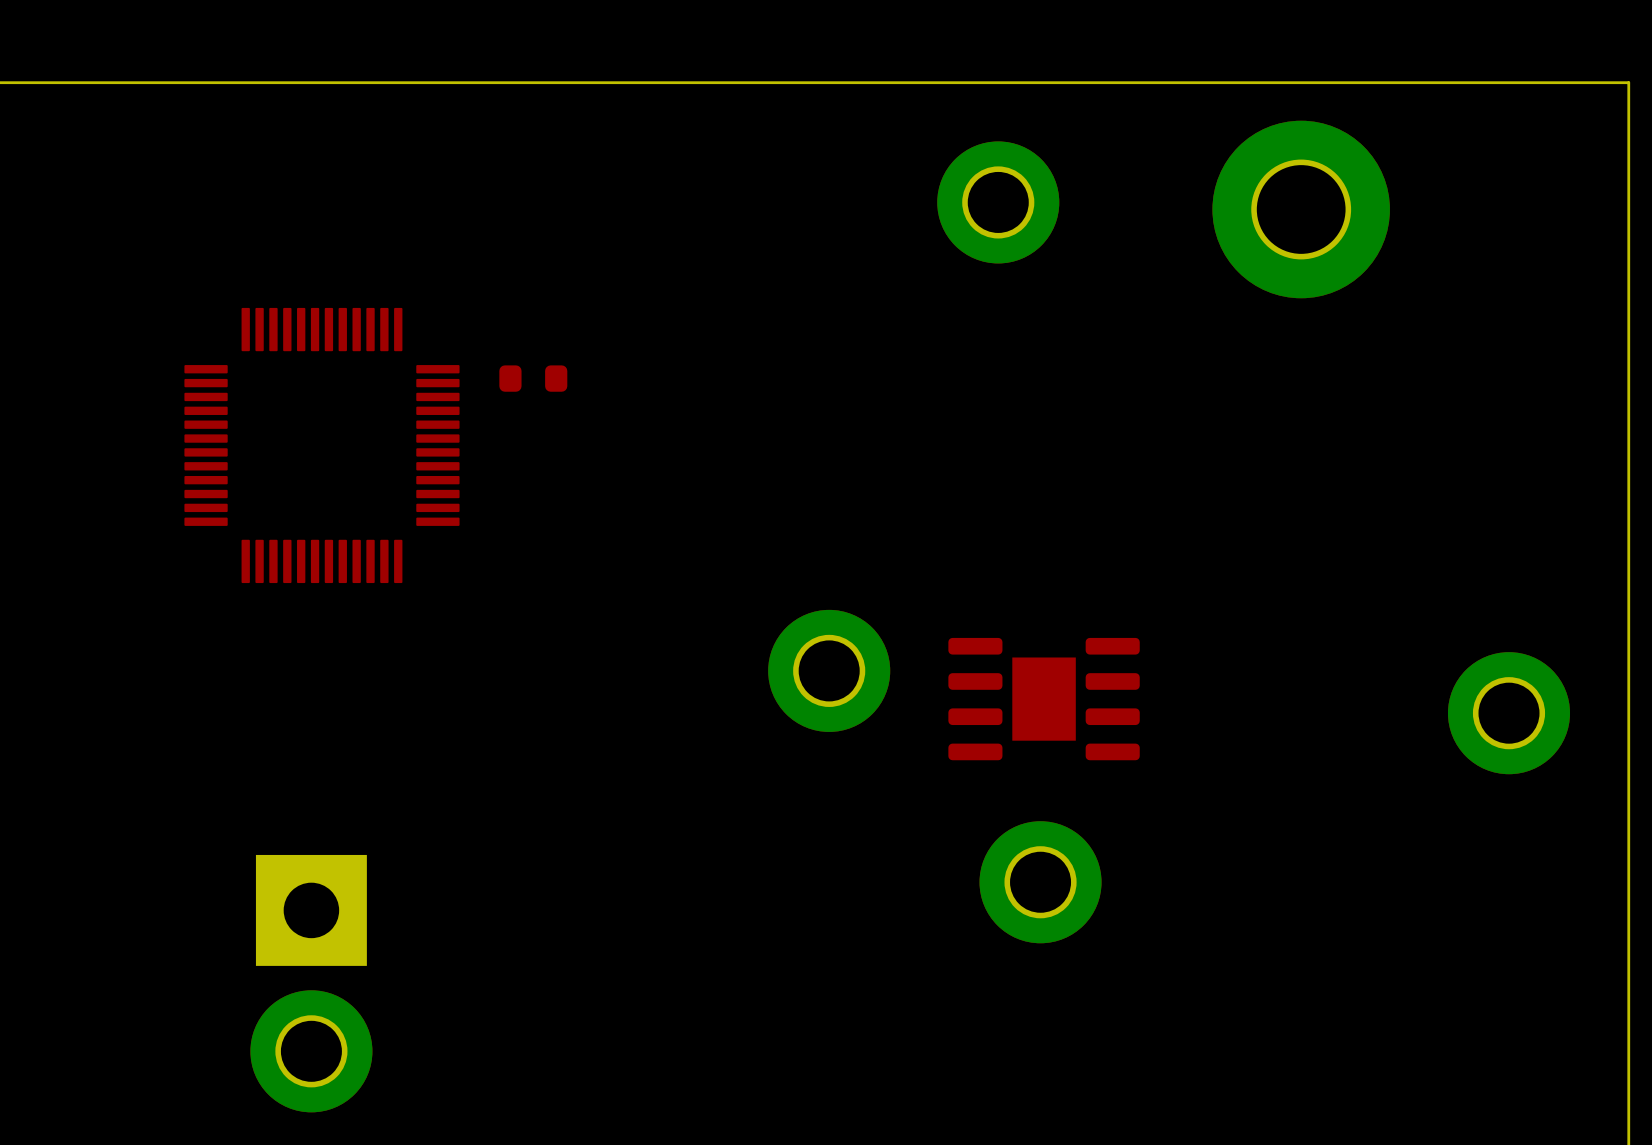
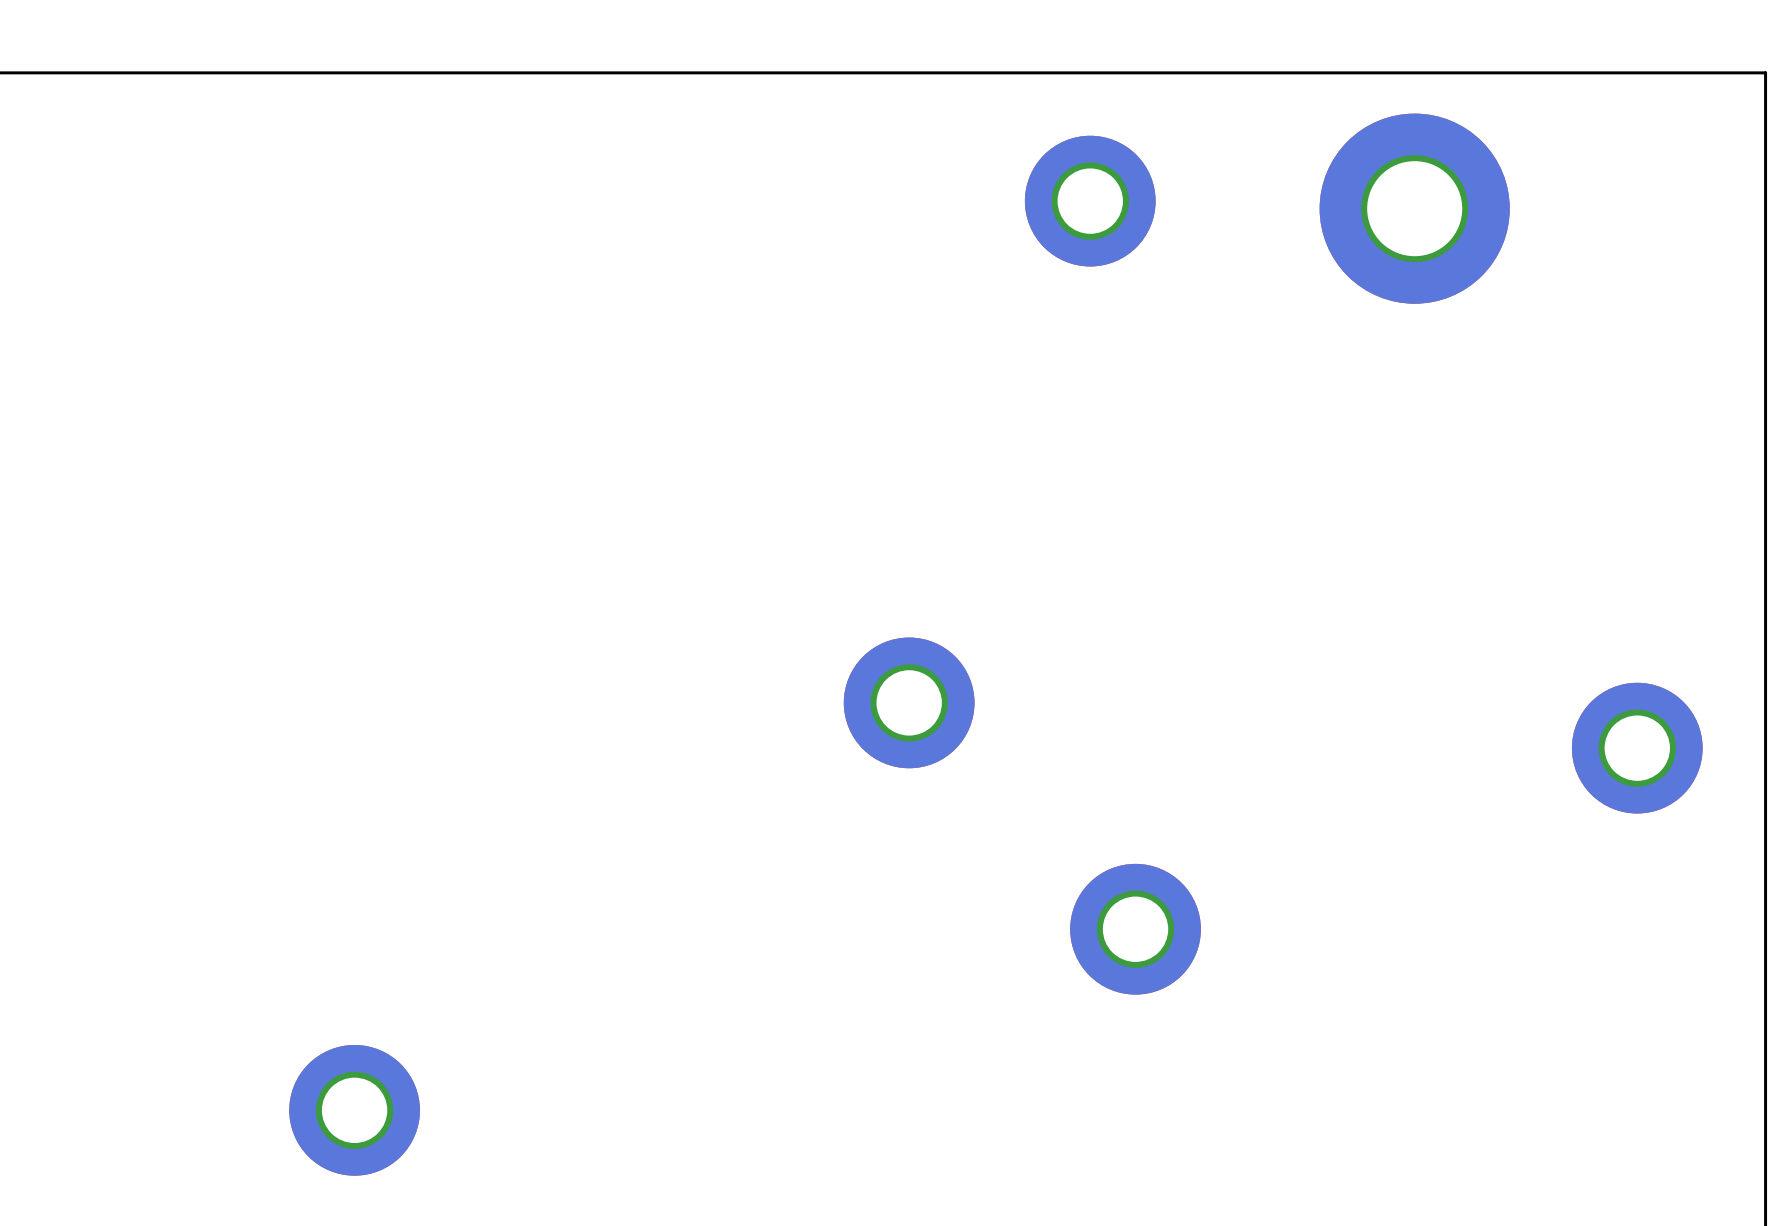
part: (533, 378) -> none
part: (321, 445) -> none
part: (1044, 699) -> none
part: (311, 910) -> none

